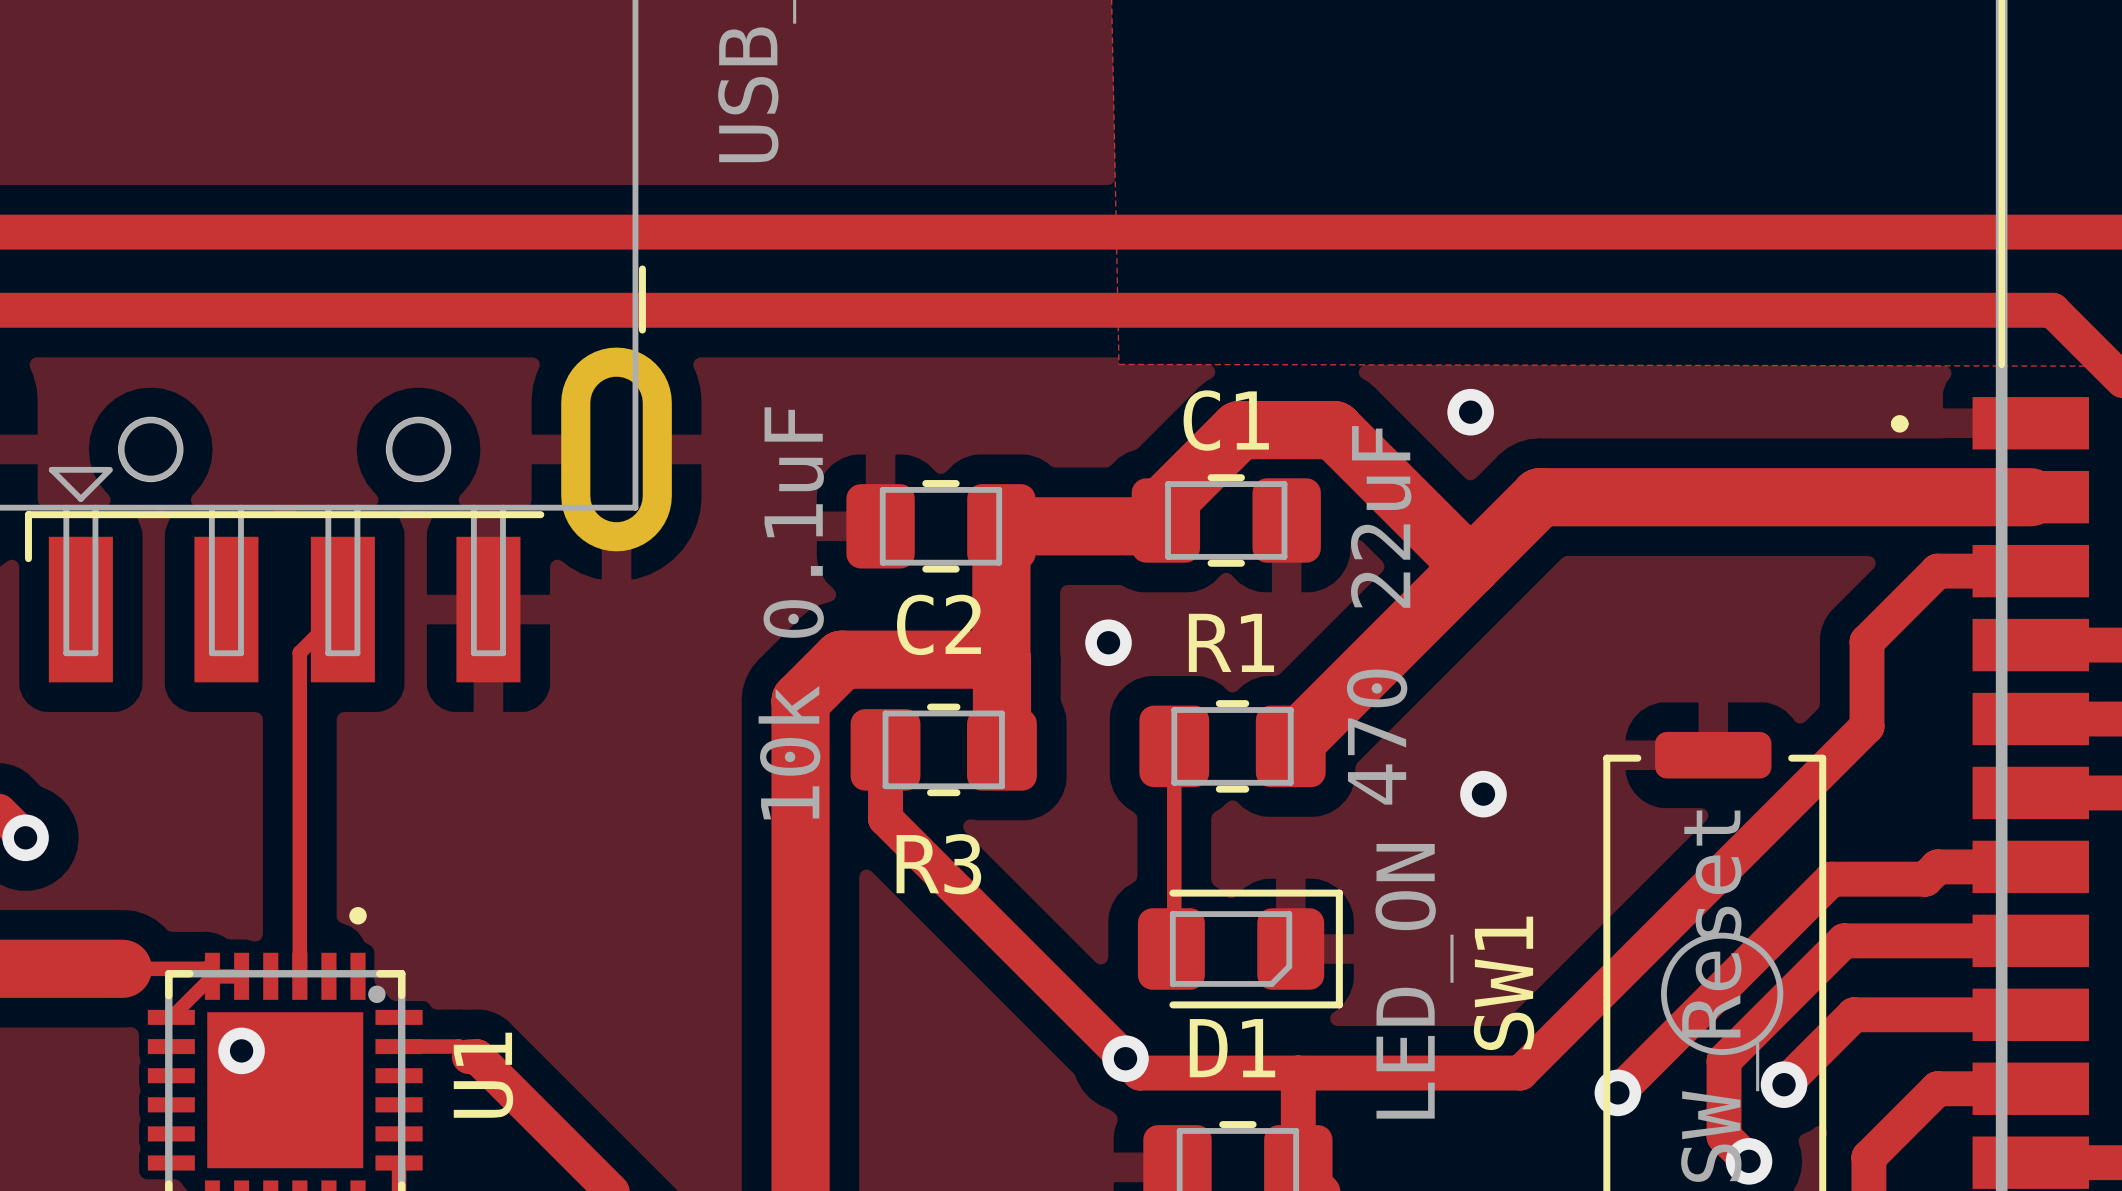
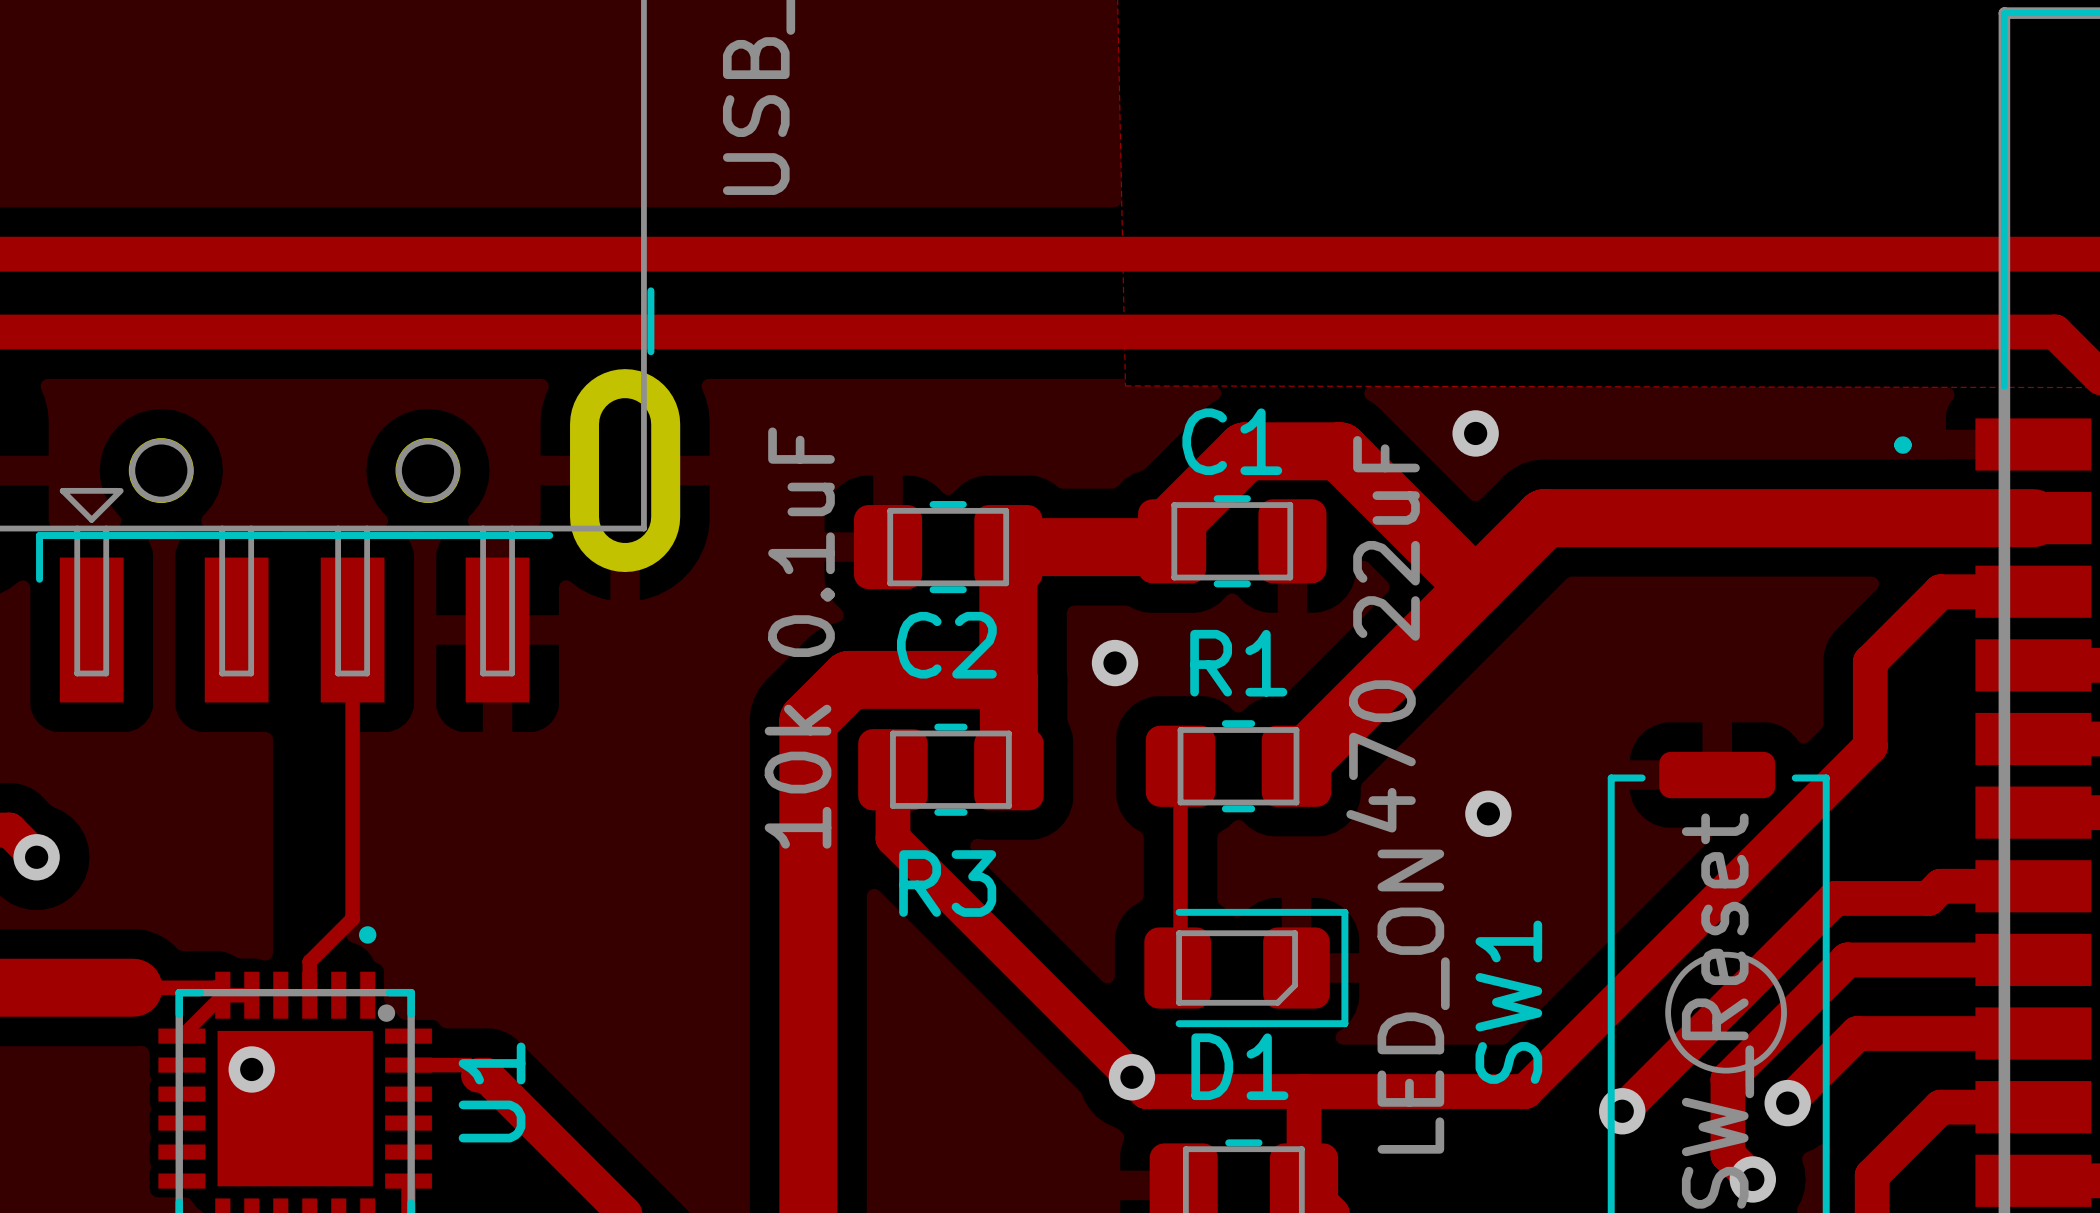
track: (342, 609) (299, 652) (299, 942) -> (352, 630) (352, 918) (309, 961)

